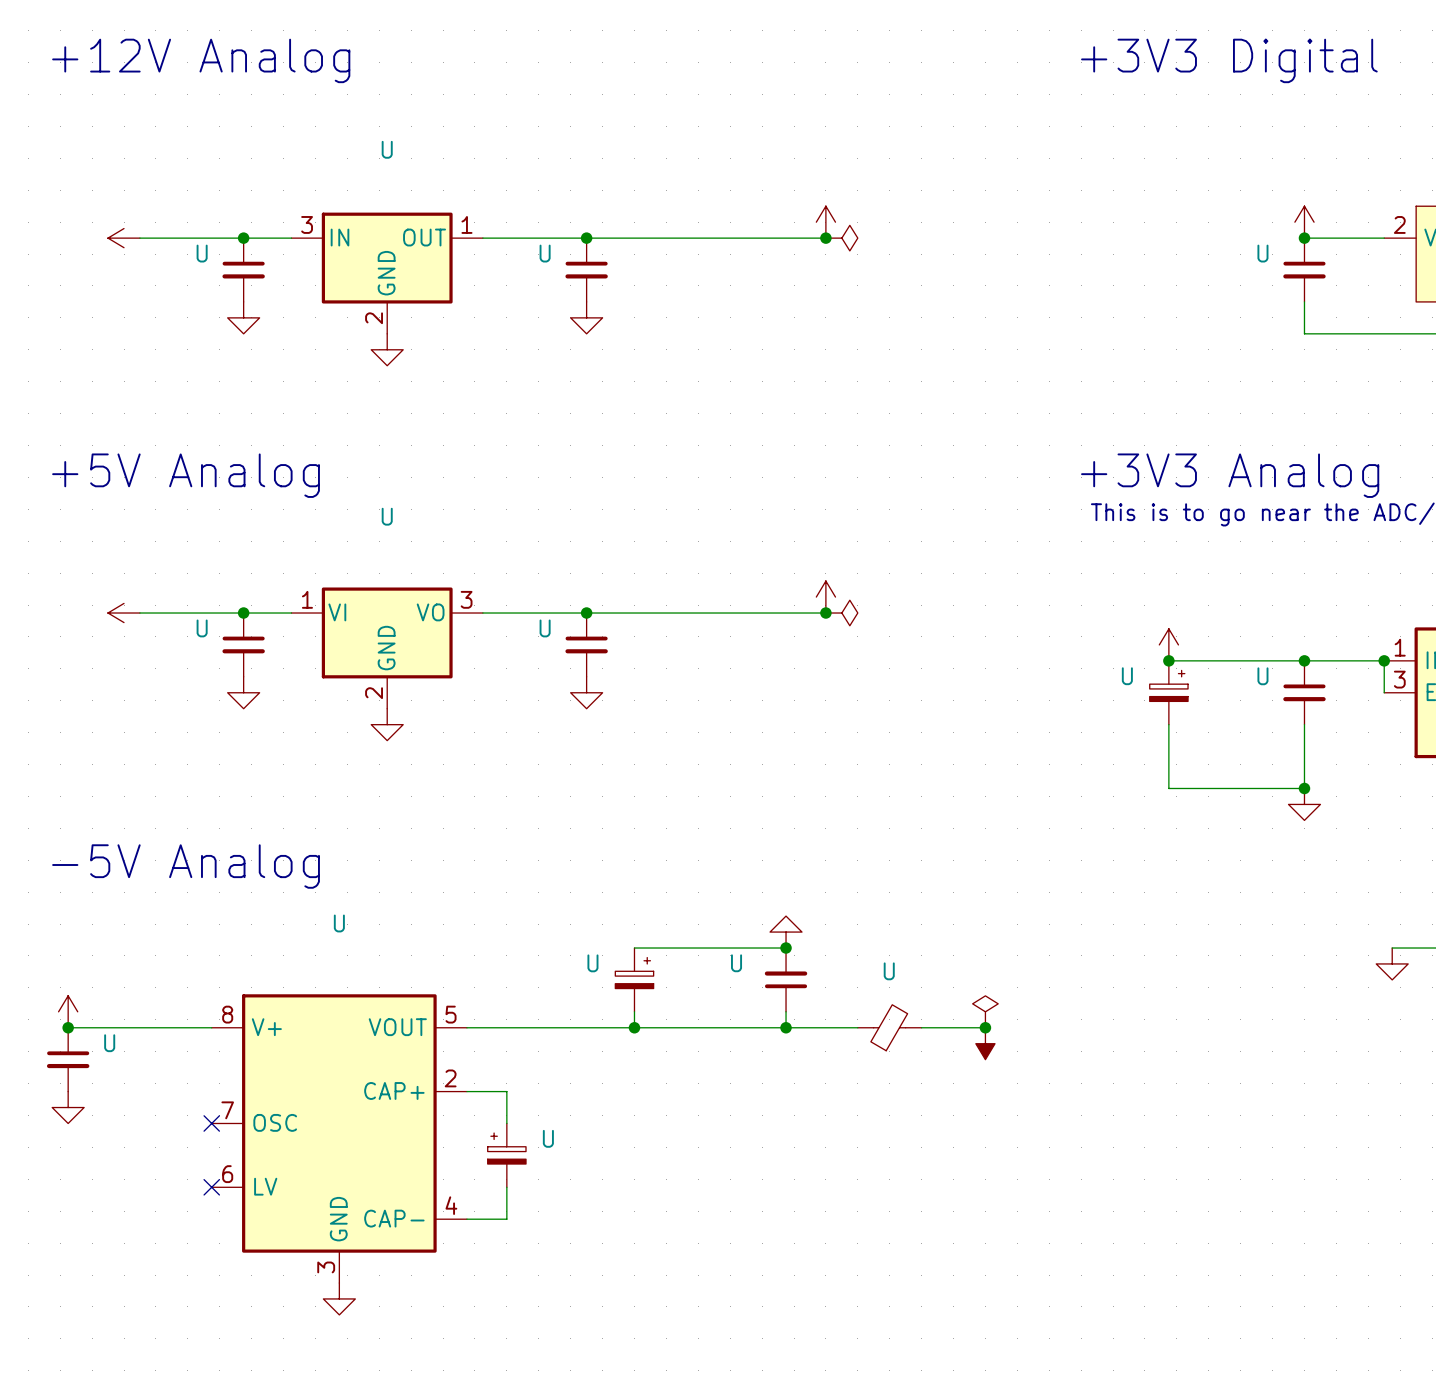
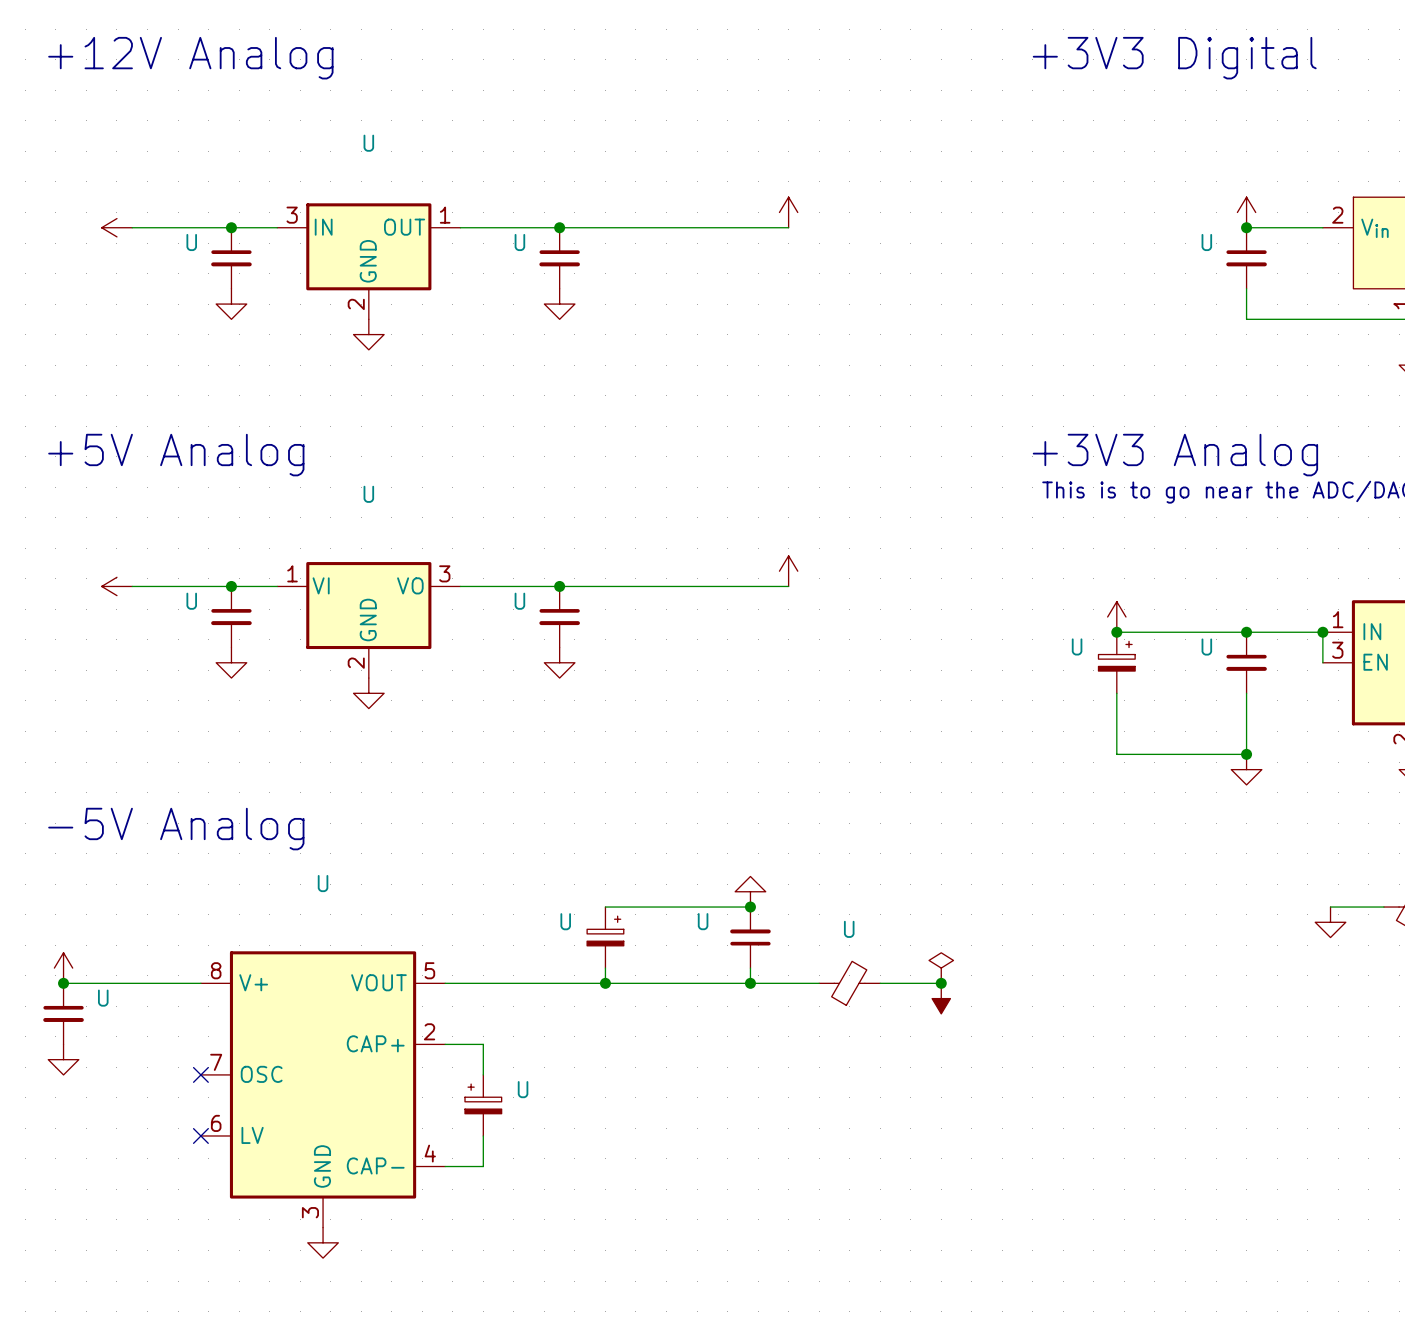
junction: (825, 238) -> none
power symbol: (841, 238) -> none
junction: (825, 613) -> none
power symbol: (841, 613) -> none

